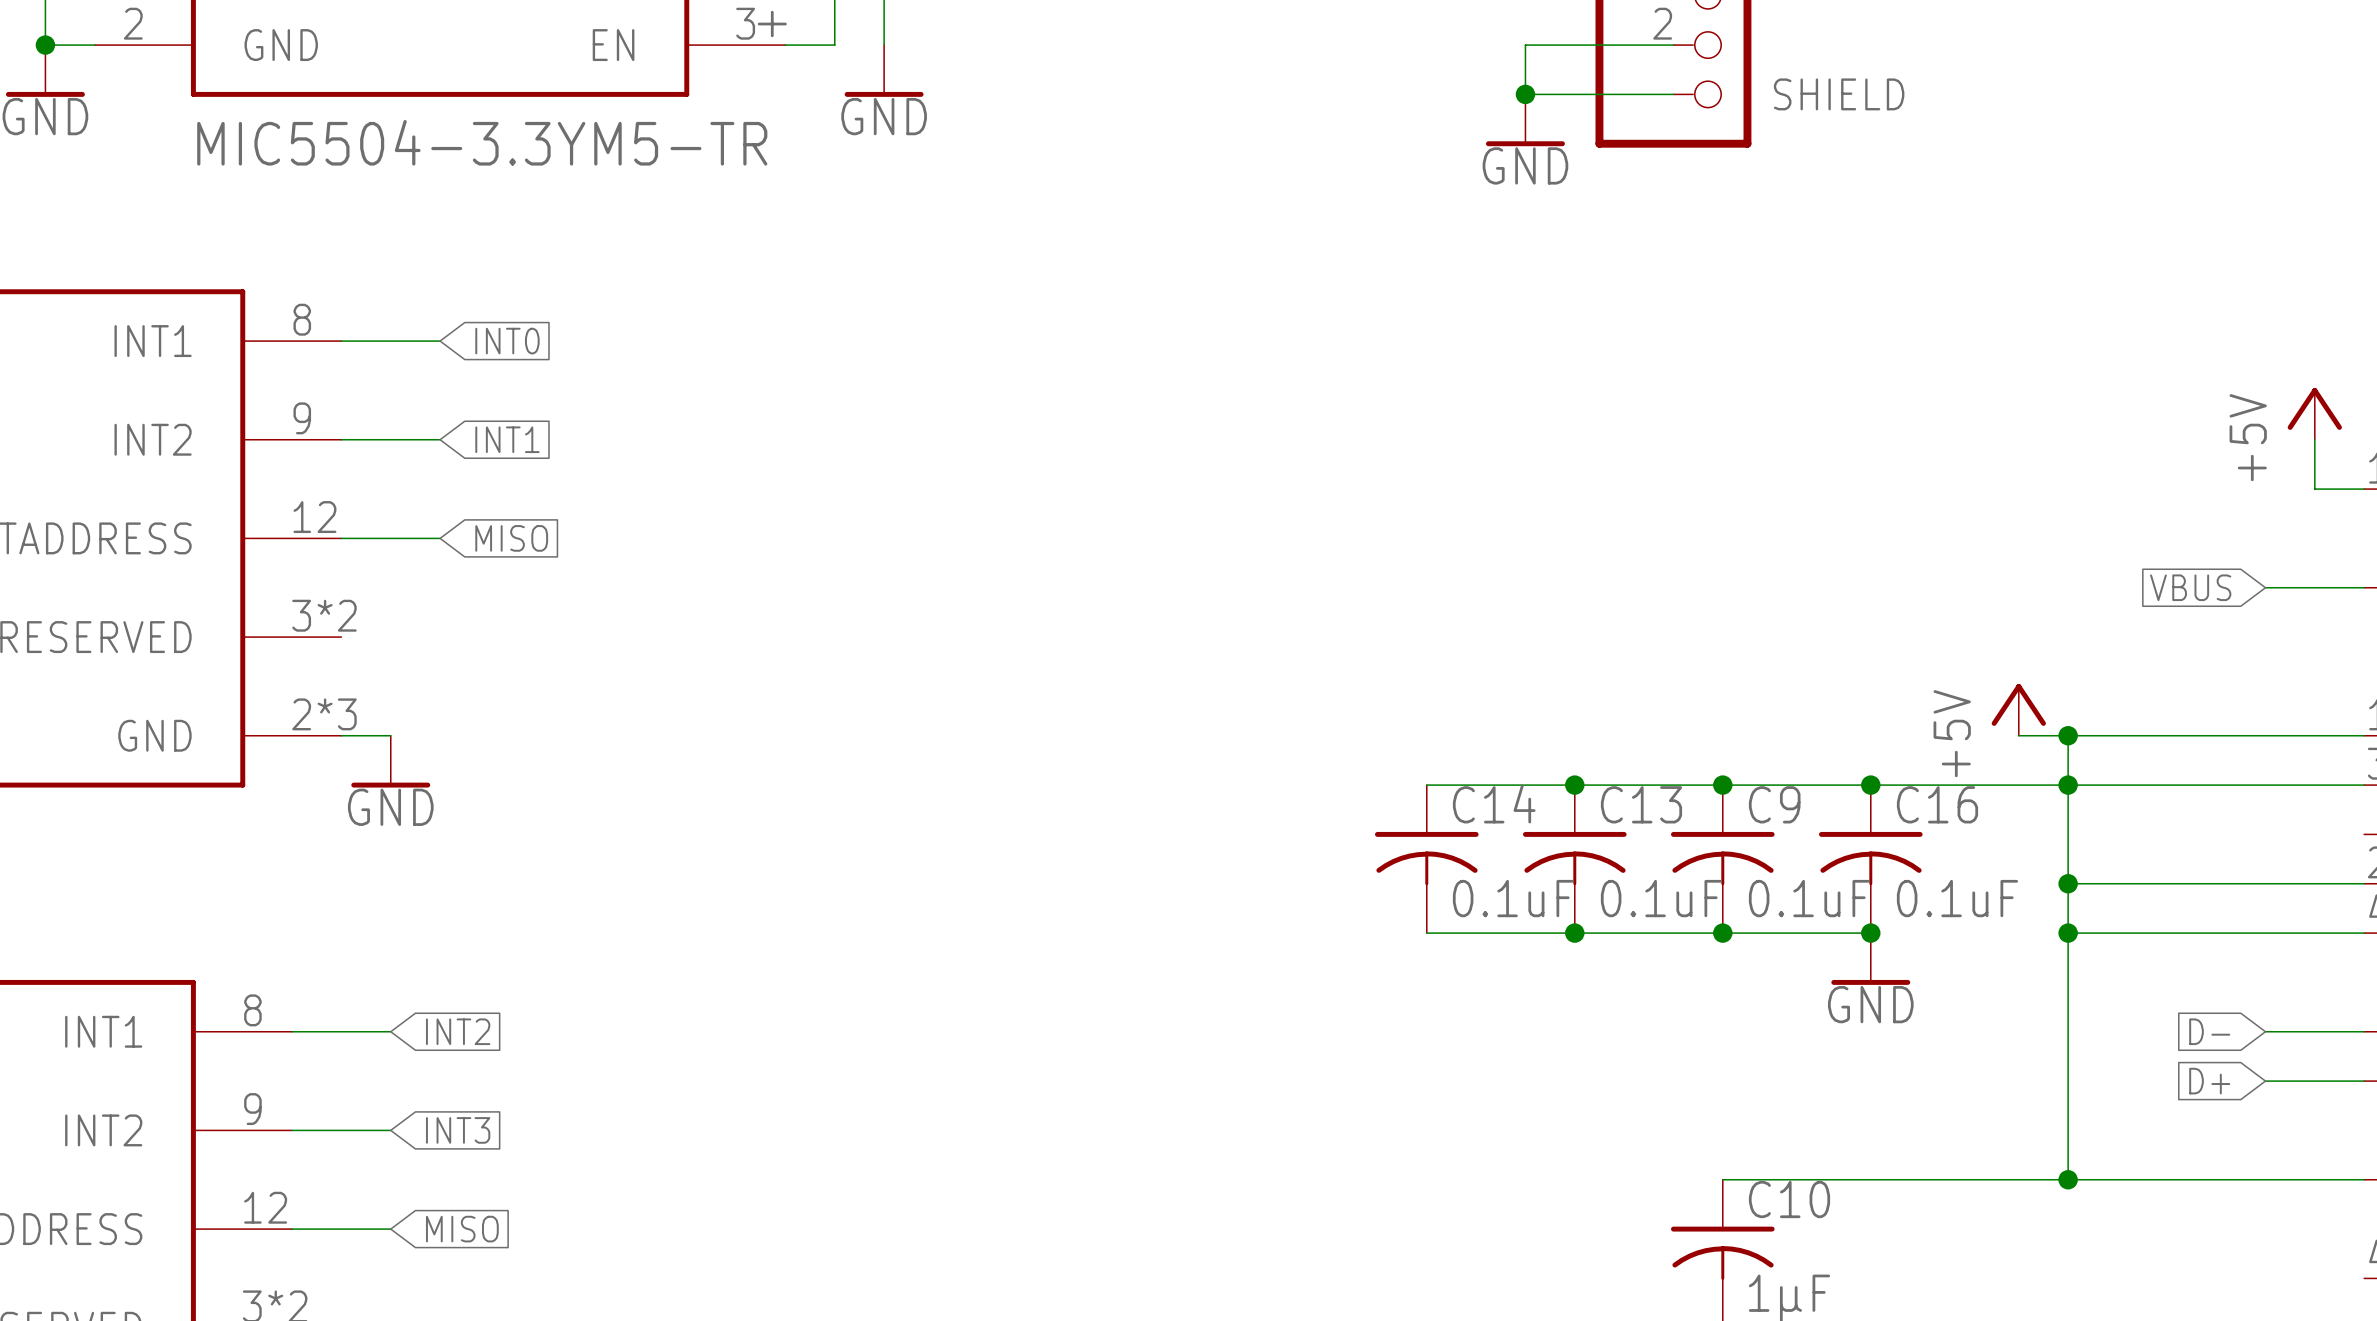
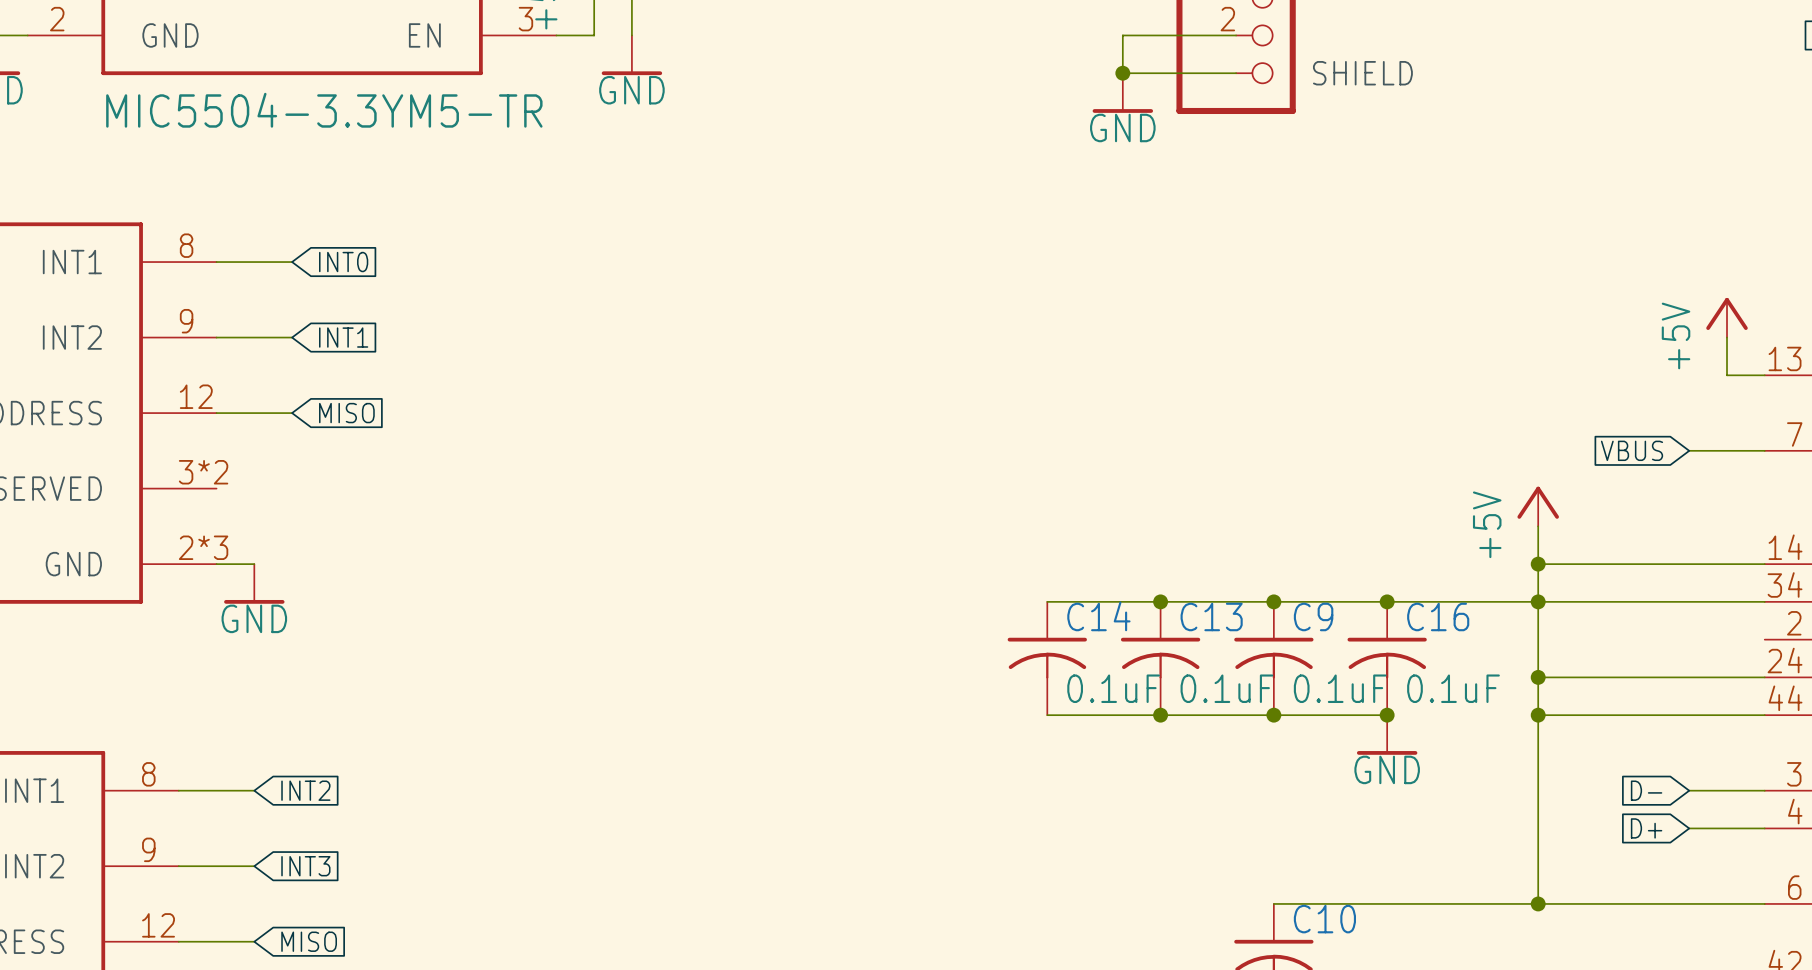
power symbol position: +5V (2018, 709) -> +5V (1538, 506)
wire: (2018, 735) (2068, 735) -> (1538, 526) (1538, 564)

